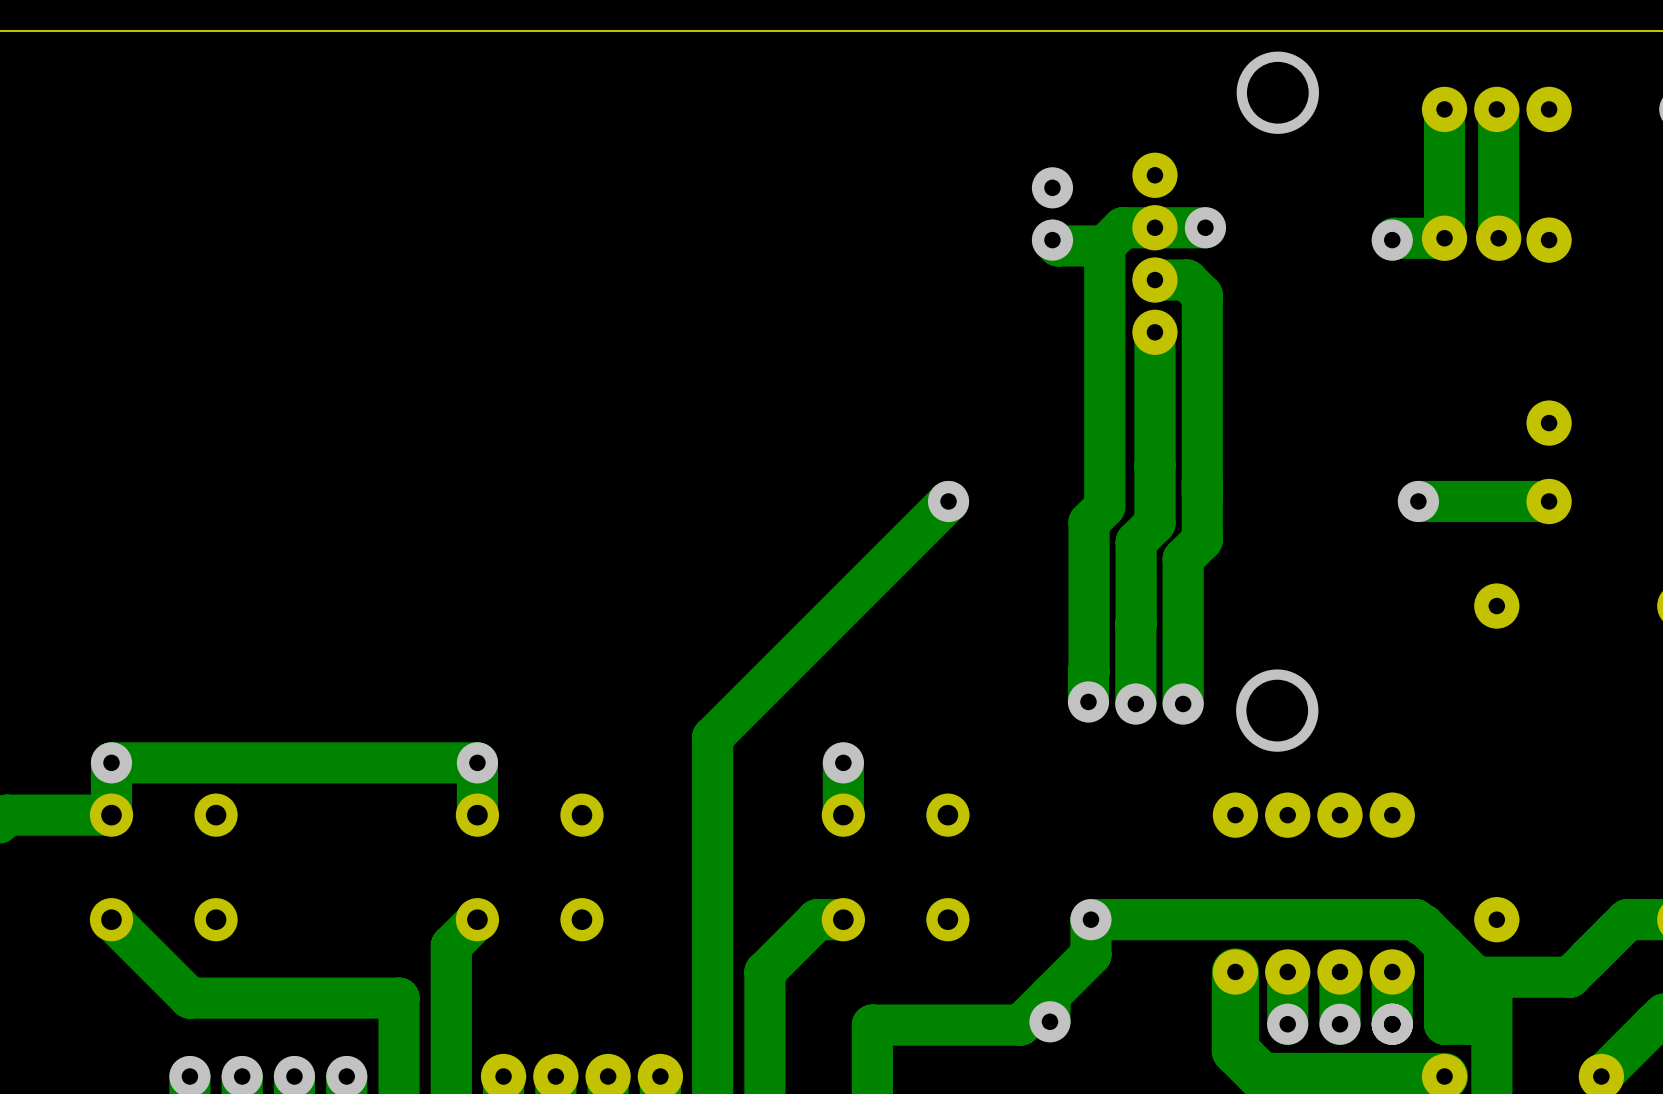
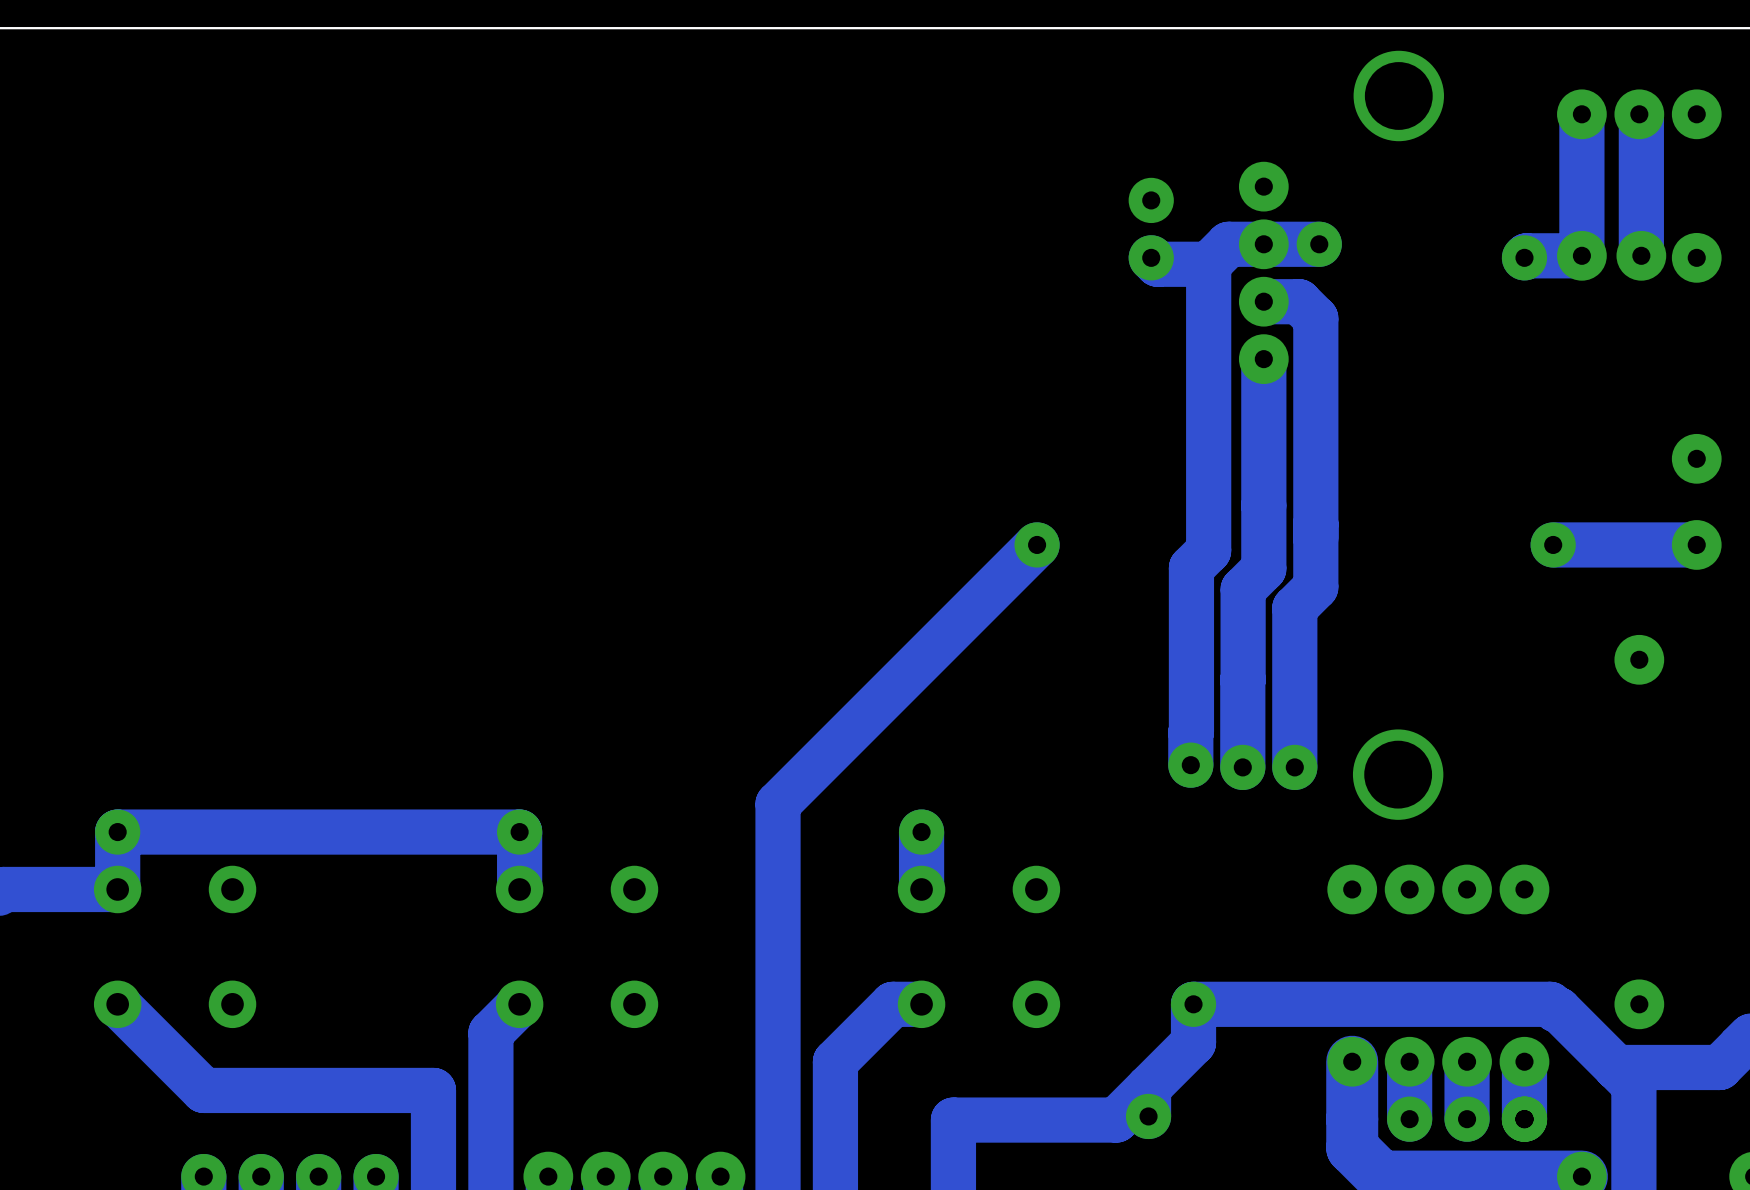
track: (1444, 945) (1444, 1024) (1470, 1024) (1470, 998) -> none

